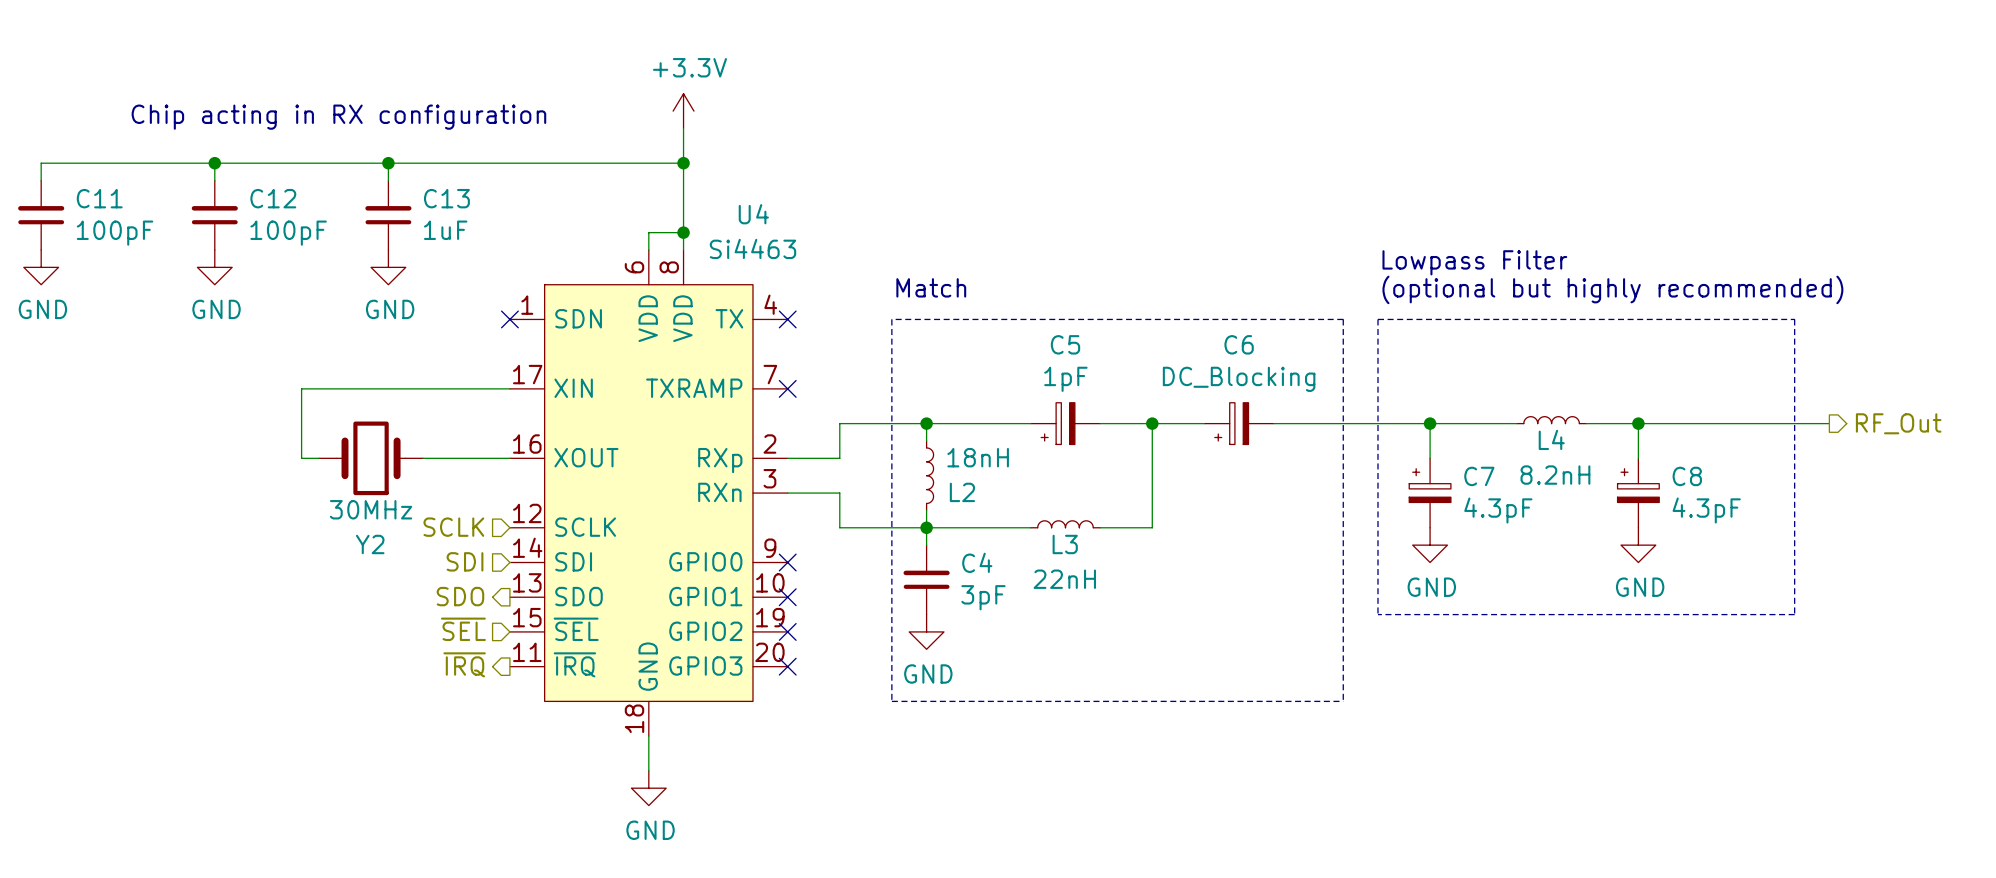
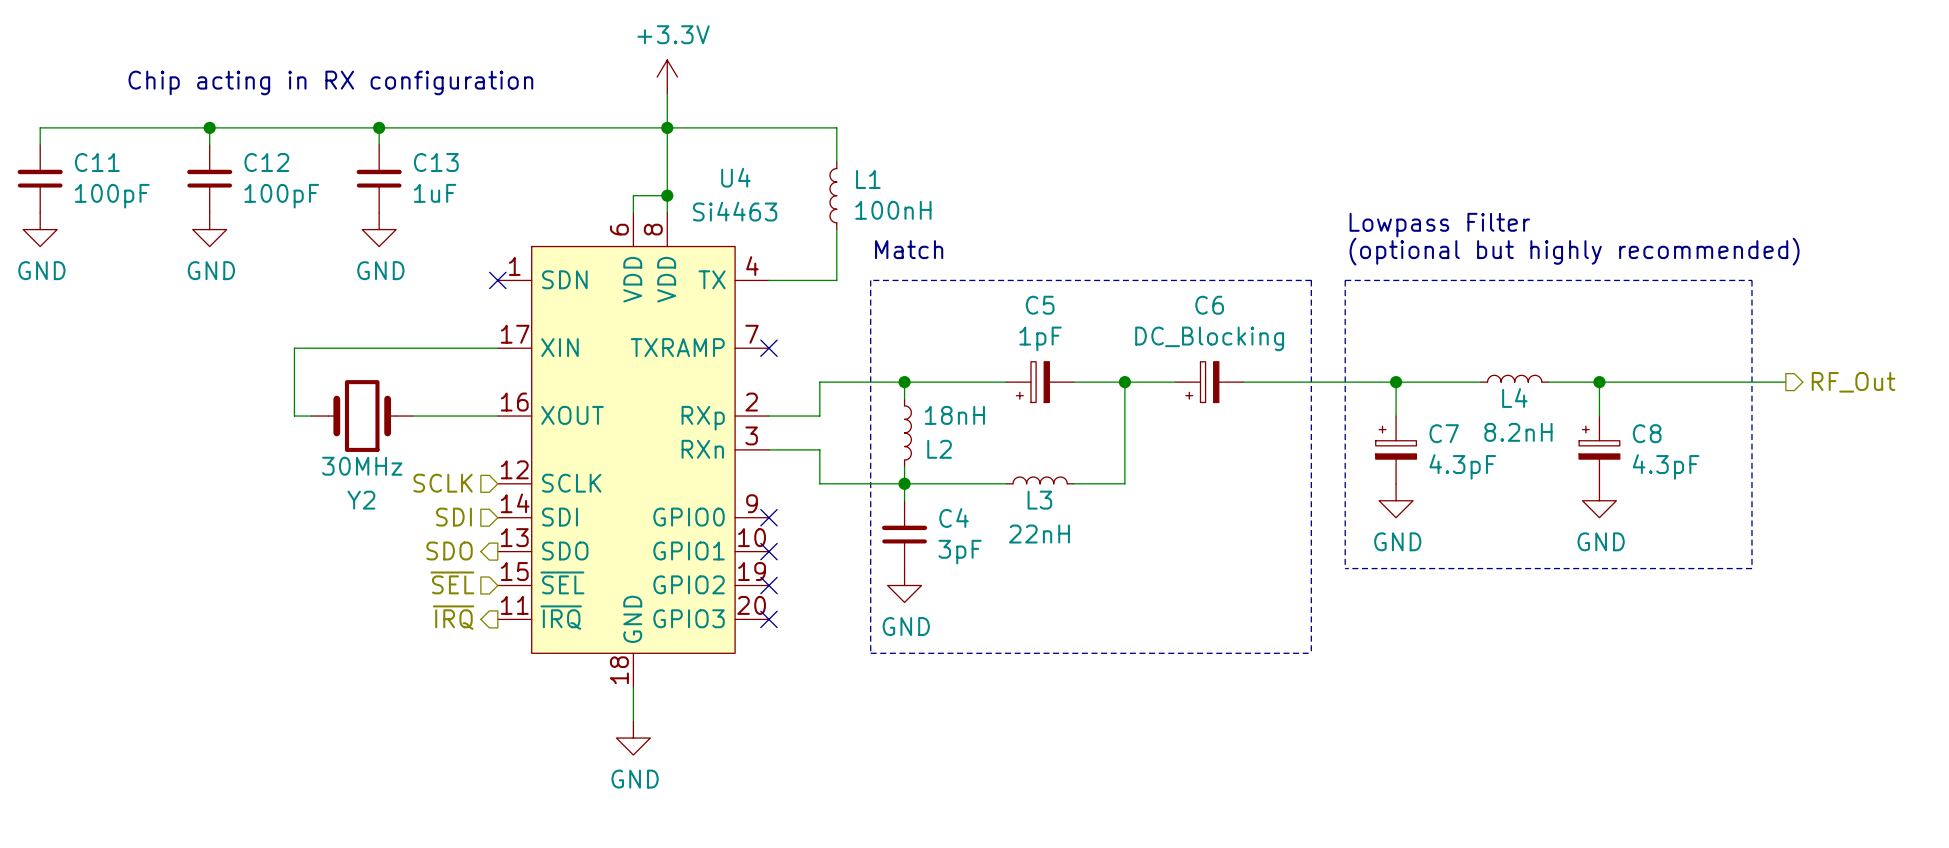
wire: none -> (667, 127) (836, 127) (836, 161)
L1: none -> 100nH (833, 195)
wire: none -> (836, 229) (836, 280) (768, 280)
no-connect mark: (787, 319) -> none

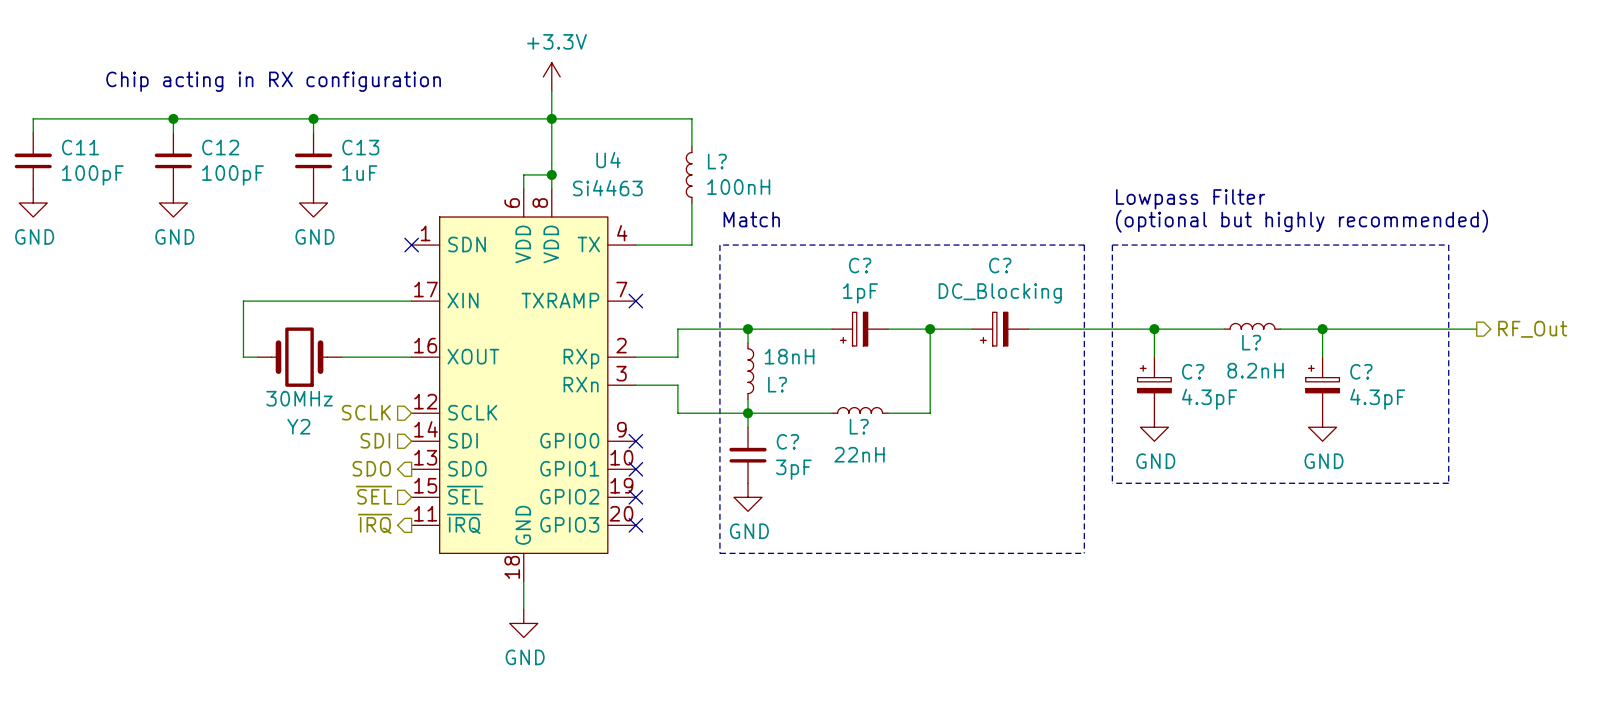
L1 name: L1 (868, 179) -> L? (717, 161)
C5 name: C5 (1040, 305) -> C? (860, 265)
C6 name: C6 (1209, 305) -> C? (1000, 265)
L4 name: L4 (1514, 398) -> L? (1251, 342)
C7 name: C7 (1444, 433) -> C? (1193, 371)
C8 name: C8 (1647, 433) -> C? (1361, 371)
L2 name: L2 (939, 449) -> L? (777, 384)
L3 name: L3 (1039, 500) -> L? (859, 426)
C4 name: C4 (954, 518) -> C? (787, 441)

